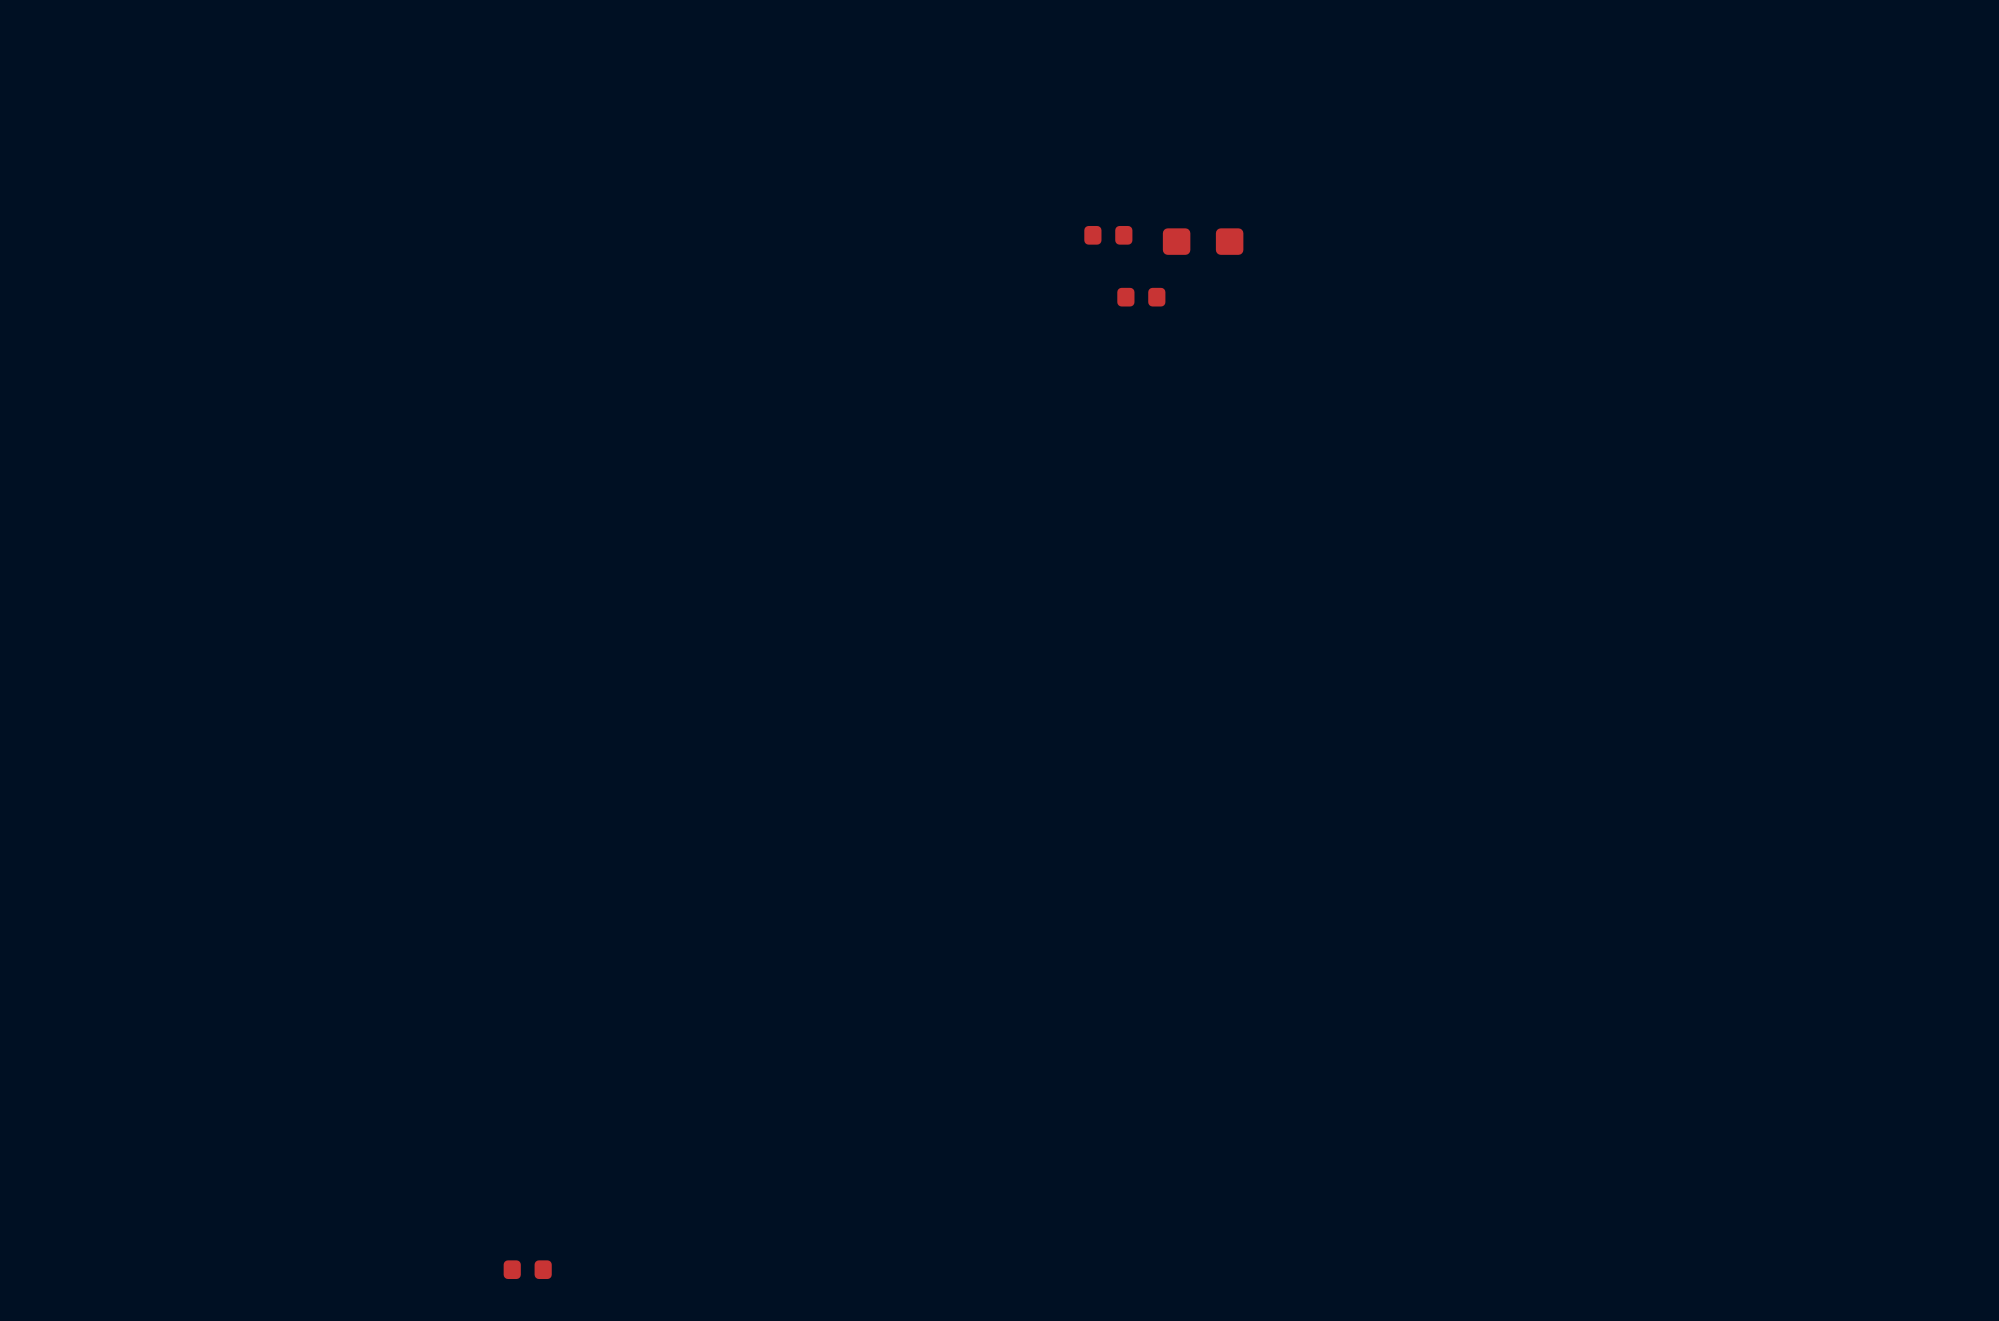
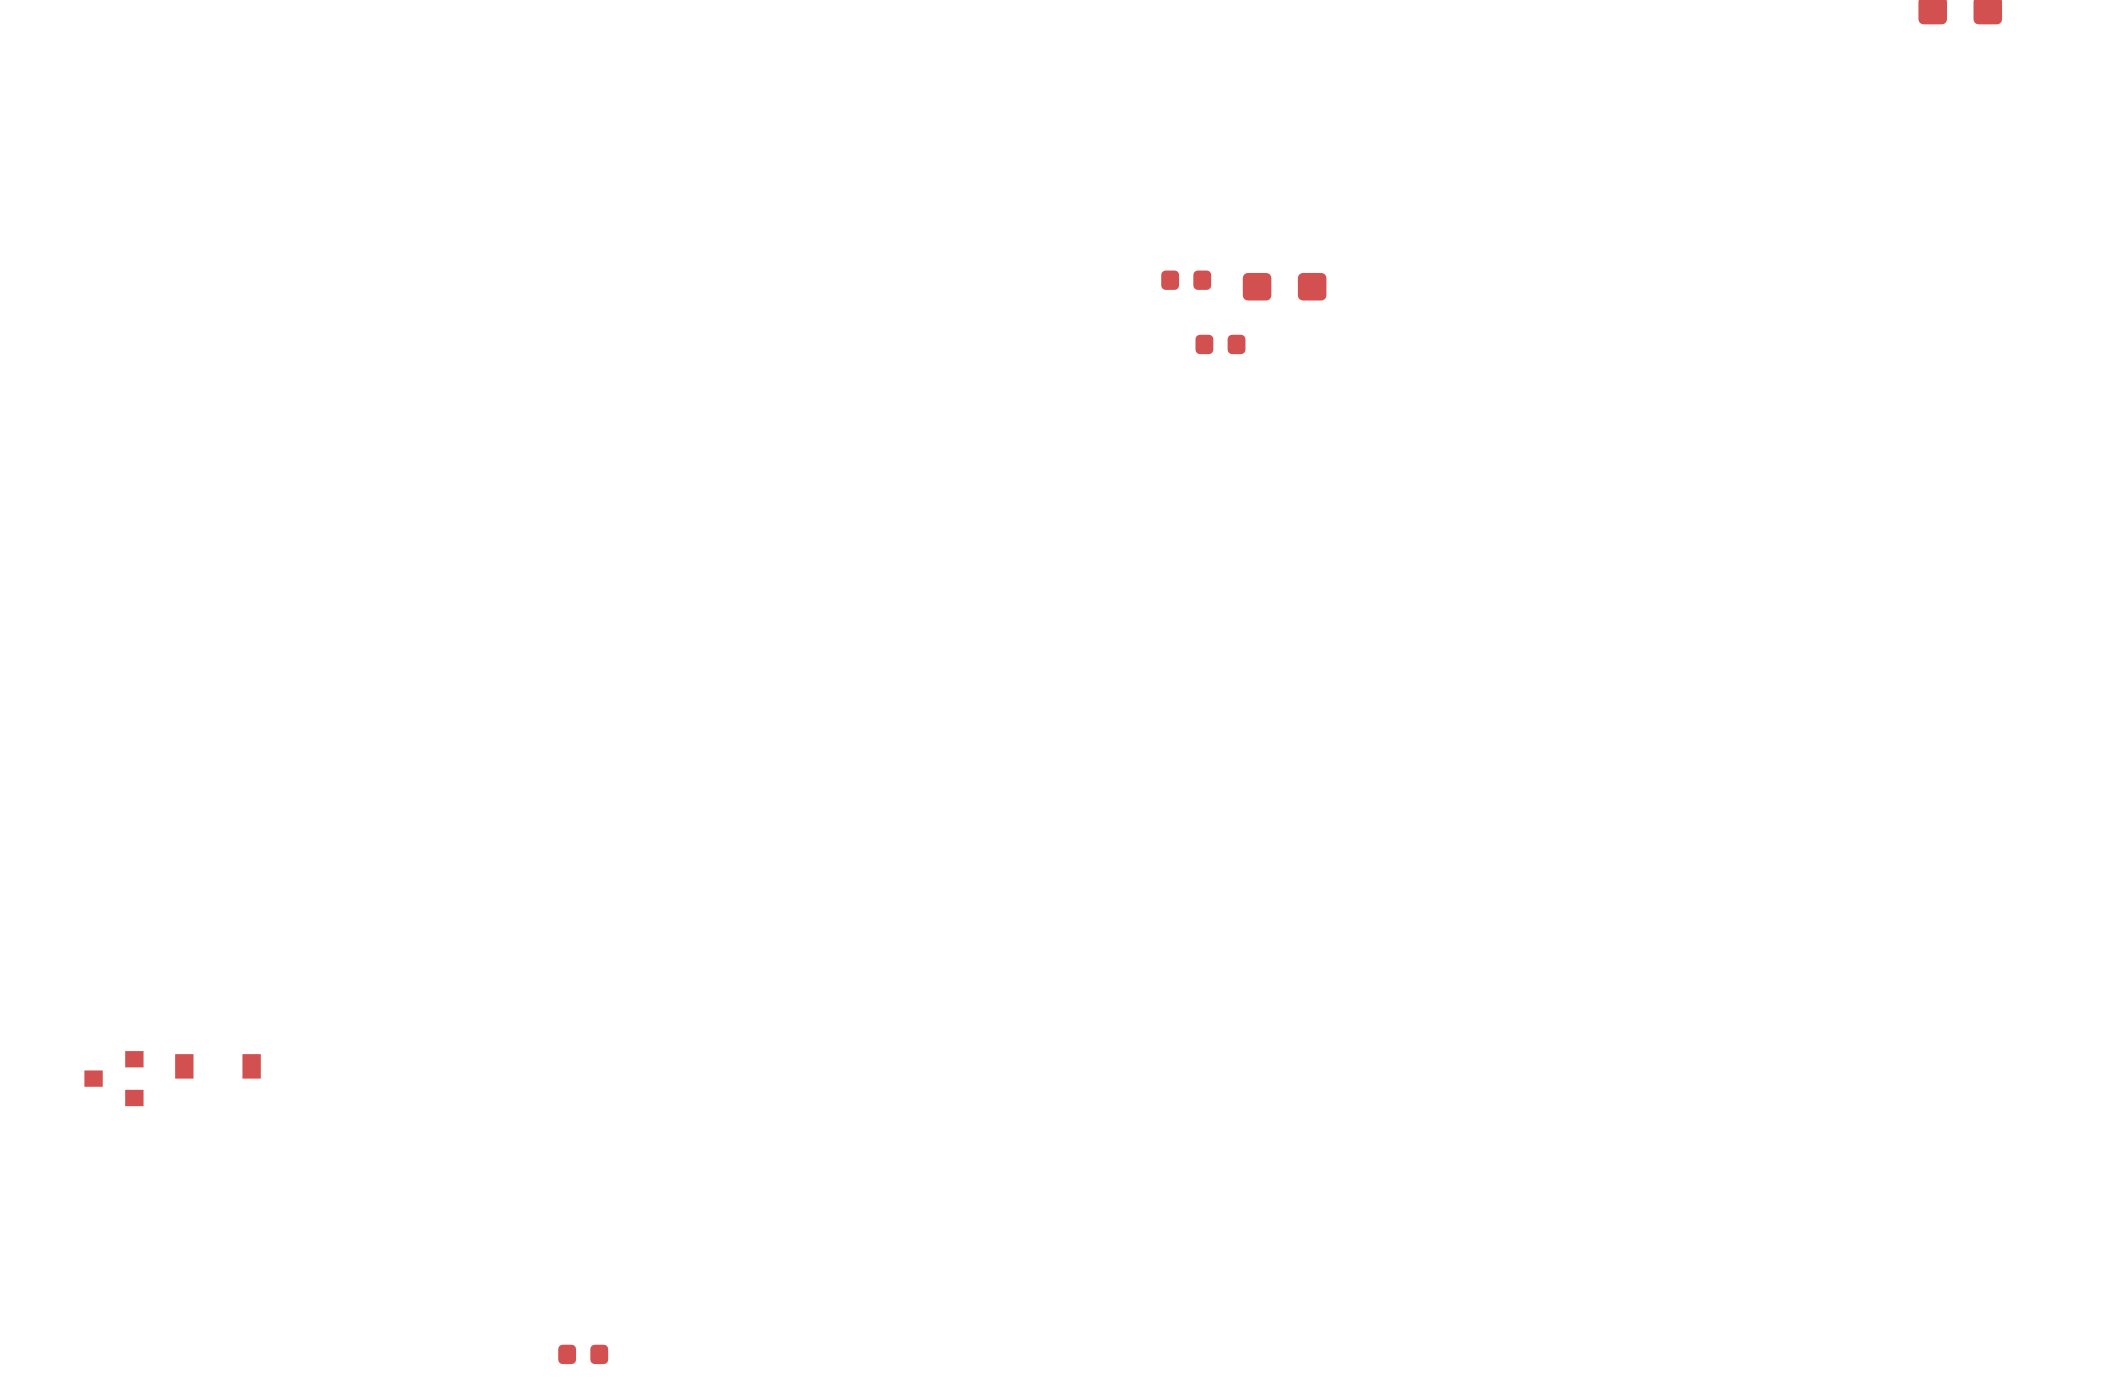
part: none -> (217, 1066)
part: none -> (113, 1078)

